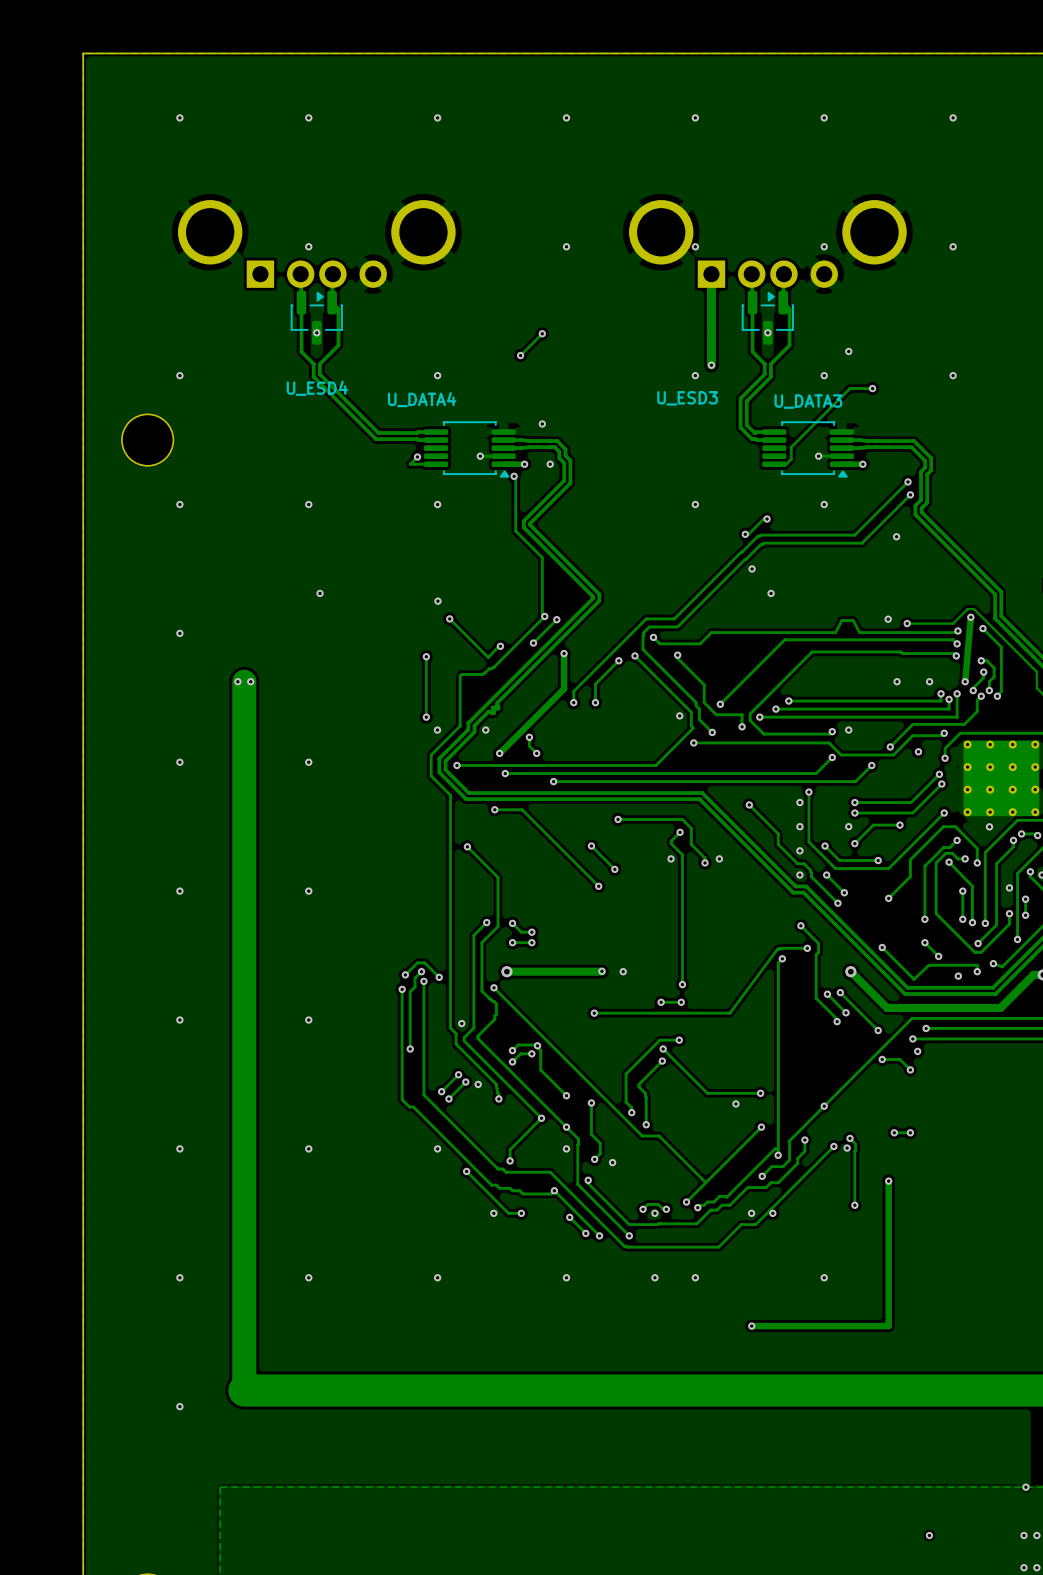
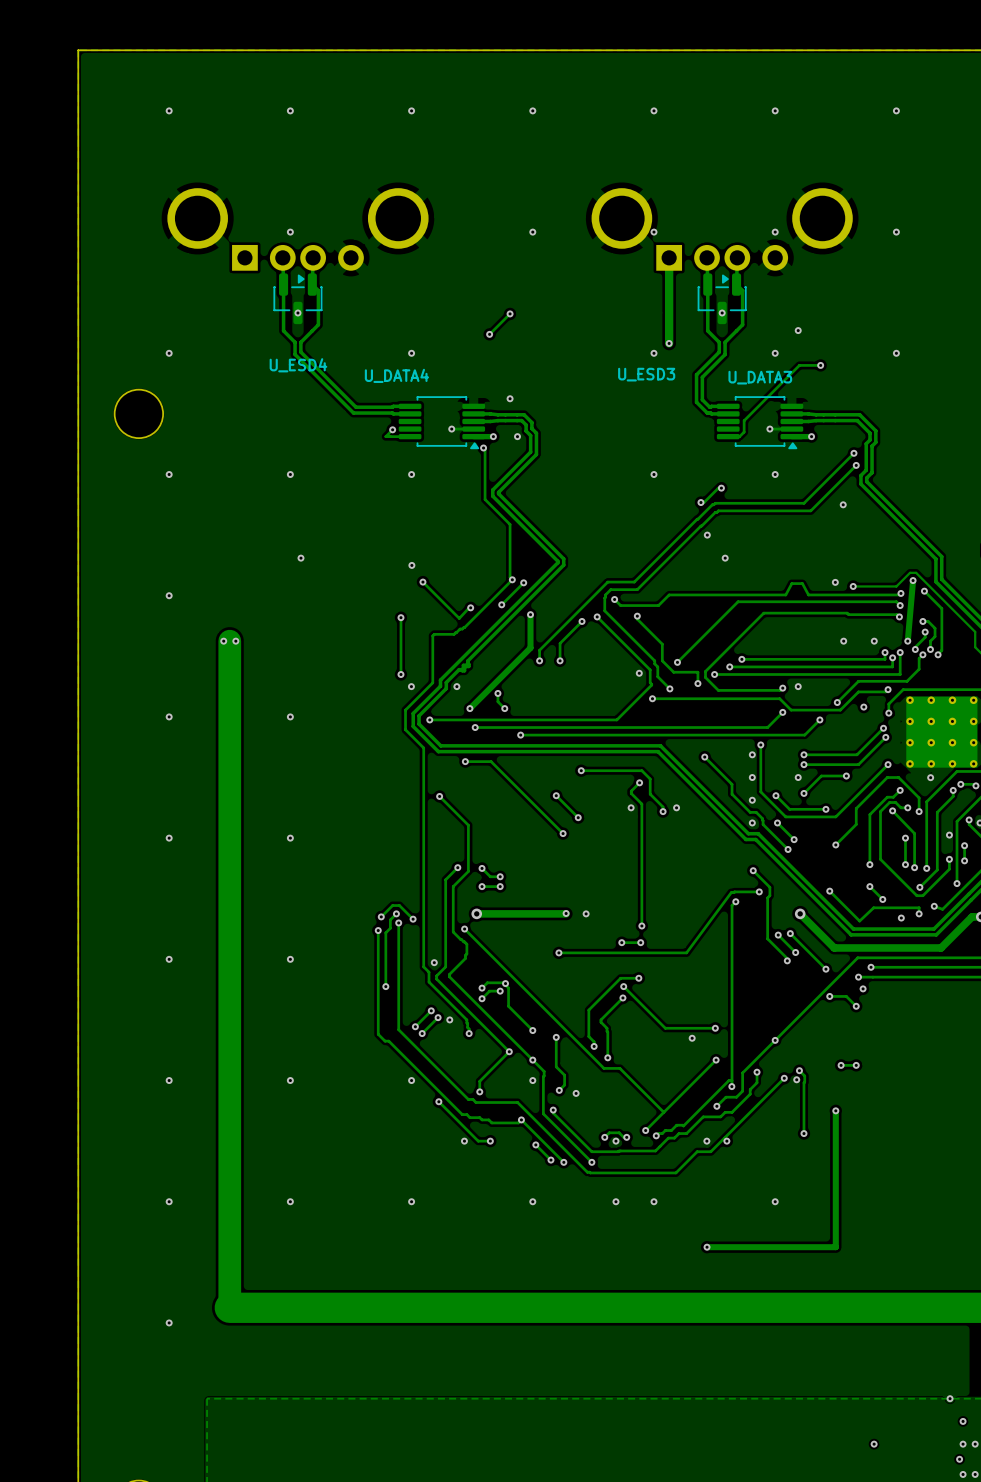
via: none -> (950, 1398)
via: (1025, 1487) -> none
via: none -> (963, 1421)
via: none -> (959, 1459)

